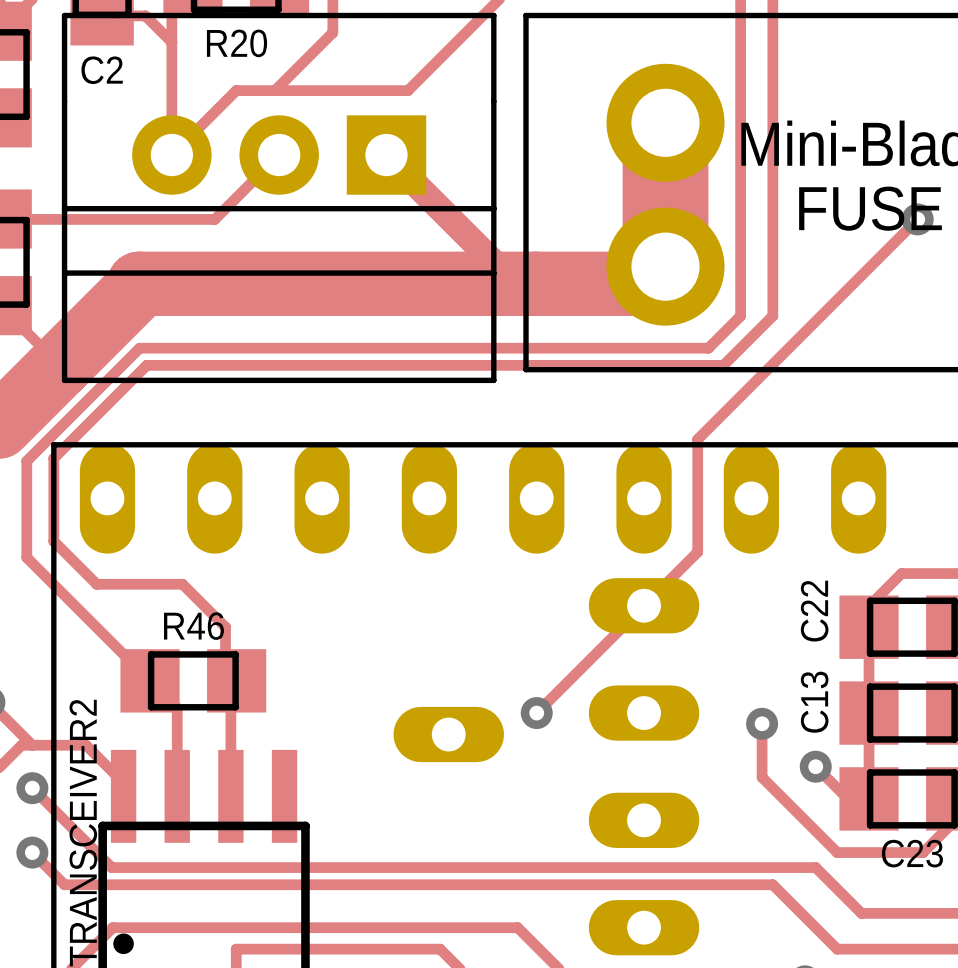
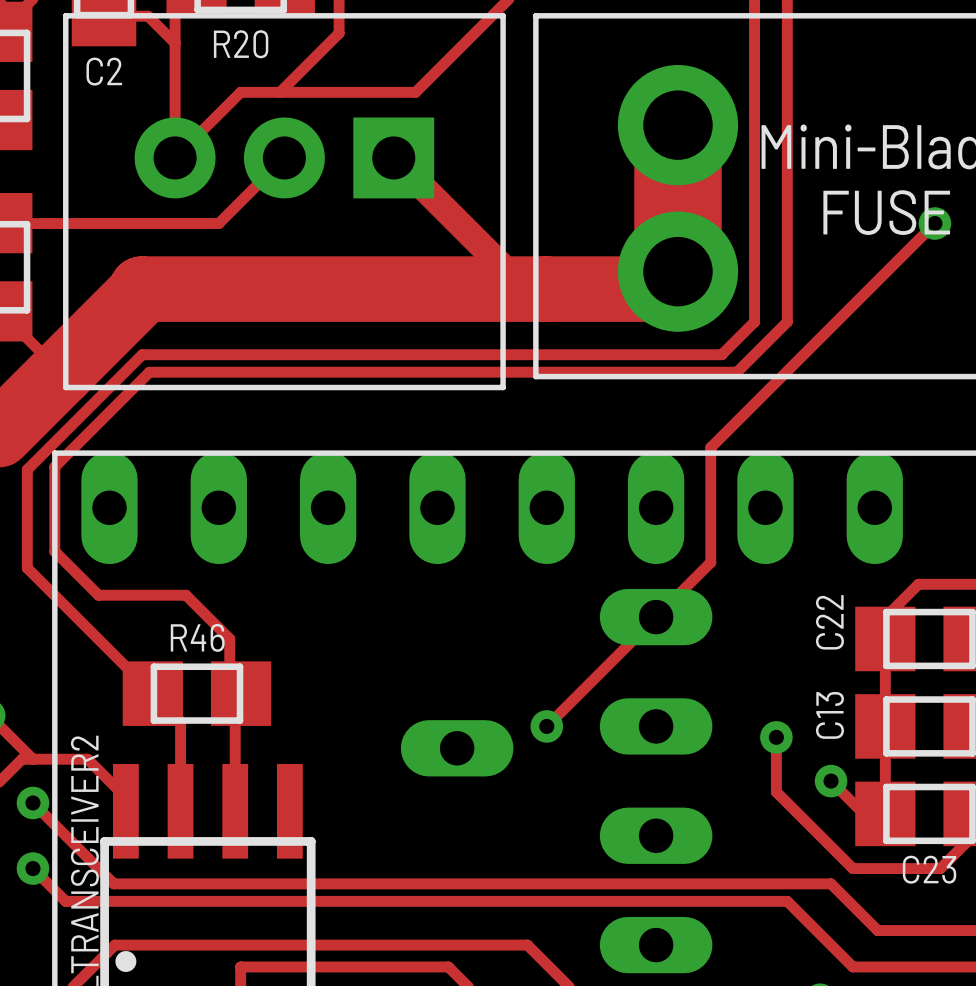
part footprint: [61, 12, 497, 384] -> [63, 13, 506, 391]

